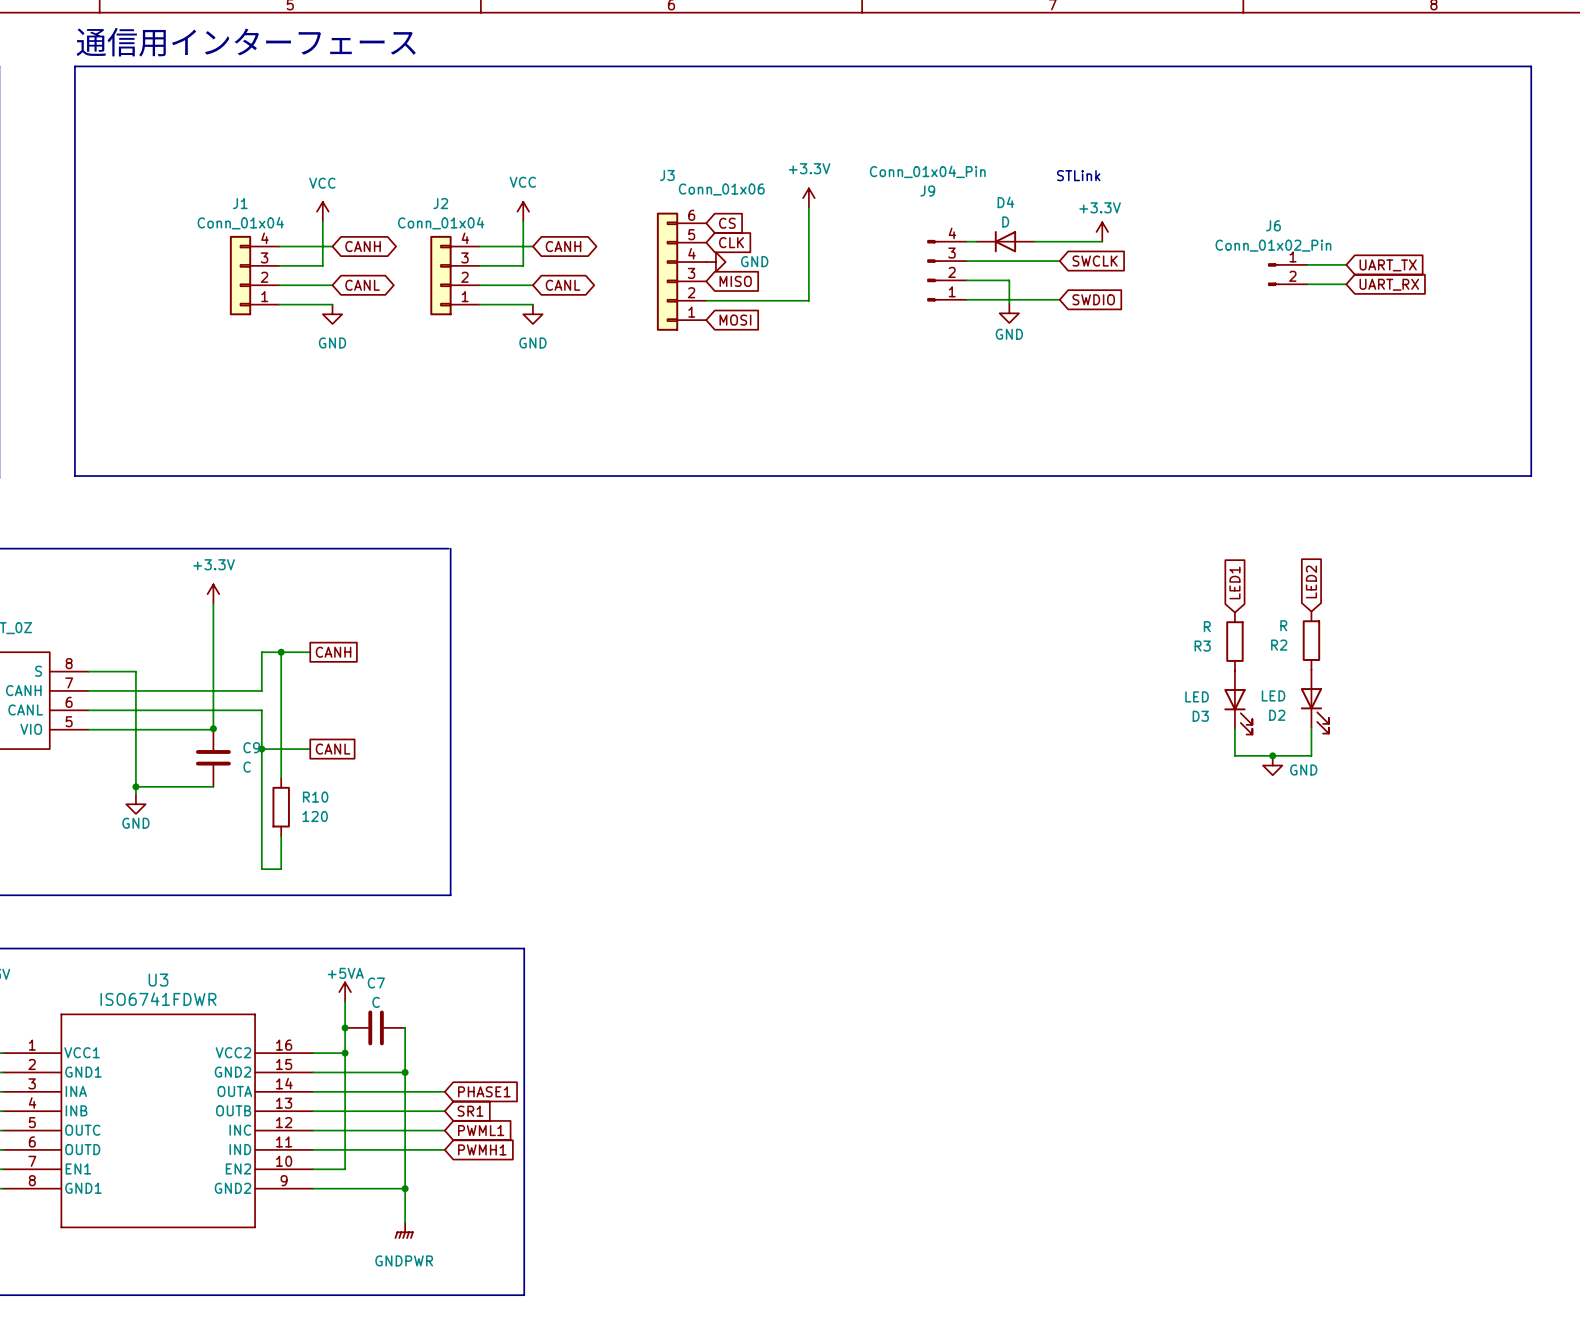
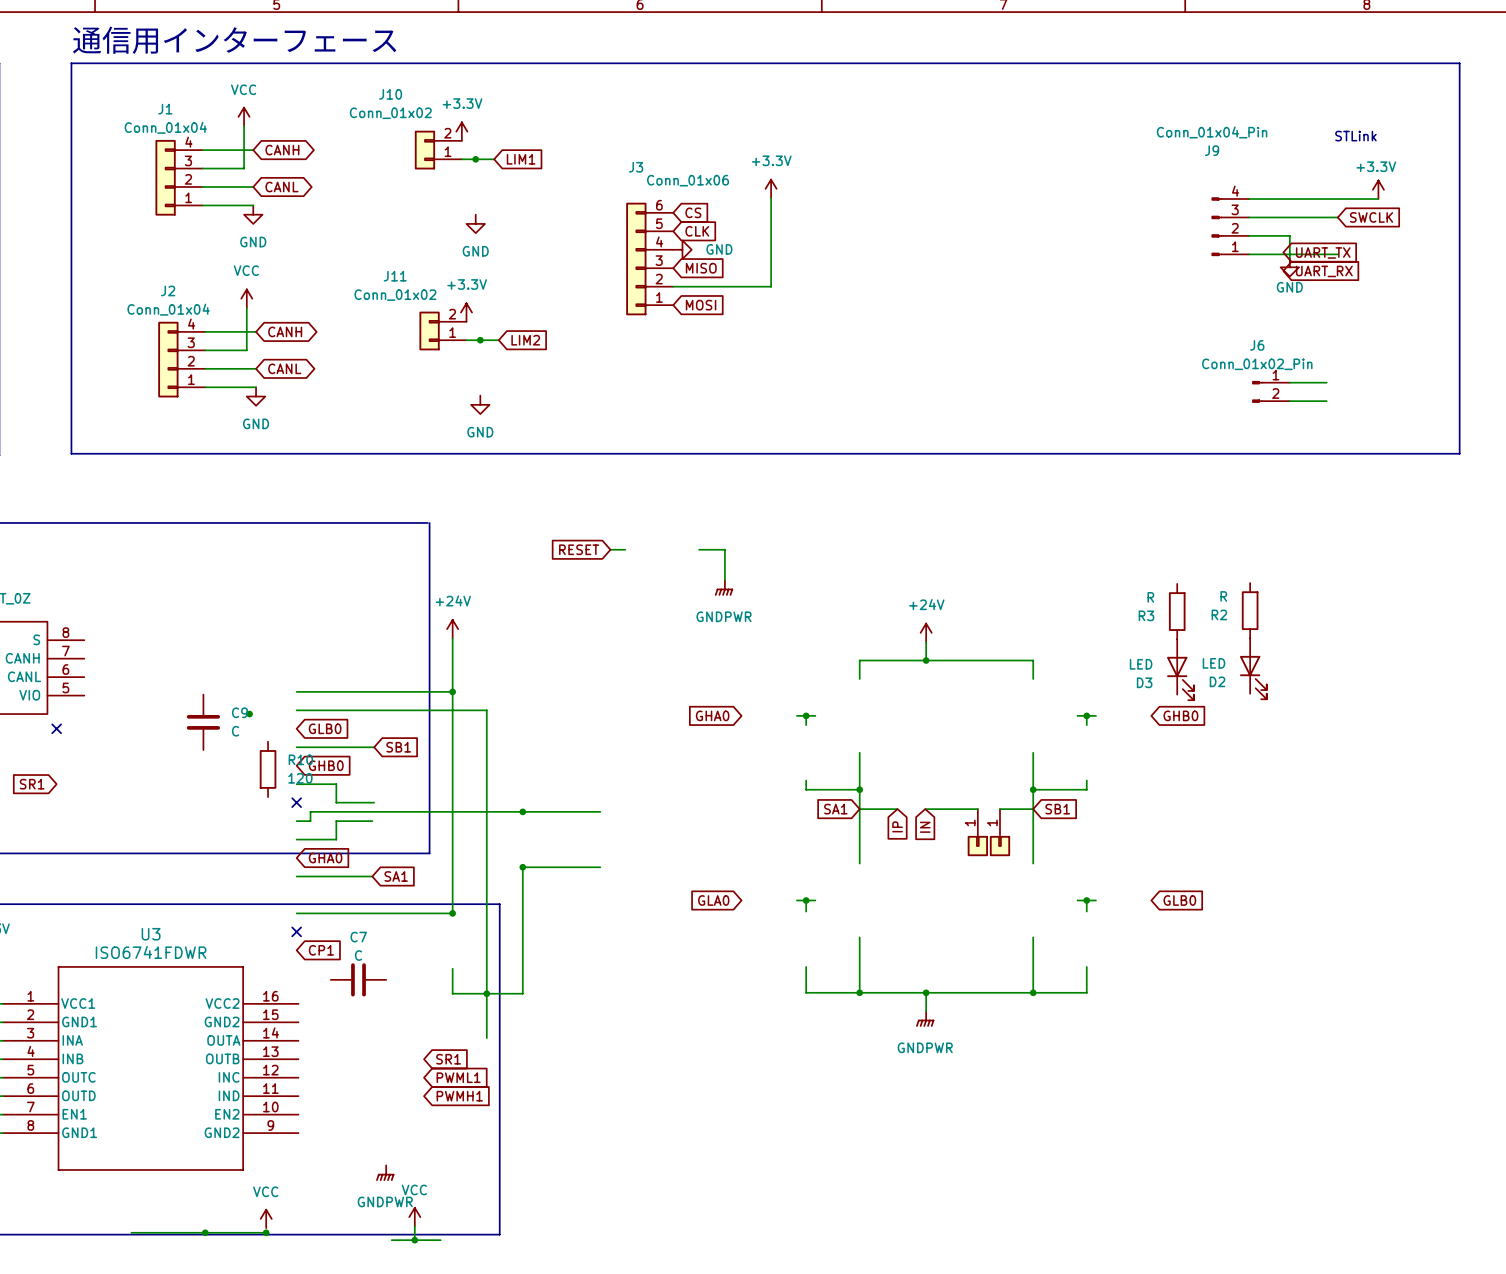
power symbol: none -> VCC (244, 116)
power symbol: none -> +3.3V (461, 131)
text: none -> STLink (1355, 136)
global label: none -> CANH (282, 150)
J10: none -> Conn_01x02 (438, 150)
wire: none -> (461, 159) (494, 159)
junction: none -> (475, 159)
global label: none -> LIM1 (521, 159)
text: STLink (1078, 175) -> none
global label: none -> CANL (281, 187)
power symbol: none -> +3.3V (1378, 189)
wire: none -> (1249, 199) (1378, 199)
power symbol: VCC (322, 211) -> none
power symbol: VCC (523, 211) -> none
wire: (322, 221) (322, 265) (279, 265) -> (244, 126) (244, 168) (202, 168)
wire: (523, 221) (523, 265) (479, 265) -> none
power symbol: none -> GND (253, 214)
wire: none -> (1249, 217) (1337, 217)
global label: none -> SWCLK (1371, 217)
power symbol: +3.3V (1102, 232) -> none
power symbol: none -> GND (475, 223)
wire: (966, 241) (976, 241) -> none
D4: D (1005, 241) -> none
wire: (1034, 241) (1102, 241) -> none
wire: (279, 246) (332, 246) -> (202, 150) (253, 150)
global label: CANH (363, 246) -> none
wire: (479, 246) (532, 246) -> none
global label: CANH (563, 246) -> none
wire: none -> (1249, 235) (1289, 235) (1289, 258)
wire: (966, 261) (1059, 261) -> none
global label: SWCLK (1095, 261) -> none
wire: (1307, 264) (1346, 264) -> (1289, 382) (1326, 382)
wire: none -> (1249, 254) (1337, 254)
J9 position: (947, 270) -> (1230, 226)
J6 position: (1287, 274) -> (1271, 391)
J1 position: (254, 275) -> (178, 177)
J2 position: (454, 275) -> (181, 359)
wire: (966, 280) (1009, 280) (1009, 303) -> none
power symbol: none -> GND (1289, 267)
wire: (1307, 284) (1346, 284) -> (1289, 401) (1326, 401)
wire: (279, 285) (332, 285) -> (202, 187) (253, 187)
global label: CANL (362, 285) -> none
wire: (479, 285) (532, 285) -> none
global label: CANL (563, 285) -> none
wire: (966, 299) (1059, 299) -> none
global label: SWDIO (1093, 299) -> none
wire: (279, 304) (332, 304) -> (202, 205) (253, 205)
wire: (479, 304) (532, 304) -> none
power symbol: none -> VCC (246, 298)
power symbol: GND (1009, 313) -> none
power symbol: GND (332, 314) -> none
power symbol: GND (532, 314) -> none
wire: none -> (246, 307) (246, 350) (205, 350)
power symbol: none -> +3.3V (466, 312)
J11: none -> Conn_01x02 (442, 330)
wire: none -> (205, 331) (256, 331)
global label: none -> CANH (285, 331)
wire: none -> (466, 340) (498, 340)
junction: none -> (480, 340)
global label: none -> LIM2 (525, 340)
wire: none -> (205, 368) (256, 368)
global label: none -> CANL (284, 368)
wire: none -> (205, 387) (256, 387)
power symbol: none -> GND (256, 396)
power symbol: none -> GND (480, 404)
global label: none -> RESET (579, 549)
wire: none -> (610, 549) (625, 549)
wire: none -> (699, 549) (724, 549) (724, 580)
global label: LED2 (1311, 581) -> none
global label: LED1 (1234, 582) -> none
power symbol: +3.3V (213, 594) -> none
wire: (213, 603) (213, 729) (88, 729) -> none
power symbol: none -> GNDPWR (724, 587)
wire: (281, 652) (281, 778) -> none
junction: (281, 652) -> none
wire: (310, 652) (261, 652) (261, 690) (88, 690) -> none
global label: CANH (333, 652) -> none
power symbol: none -> +24V (452, 629)
power symbol: none -> +24V (926, 632)
wire: none -> (452, 638) (452, 913) (296, 913)
wire: (88, 671) (135, 671) (135, 794) -> none
wire: none -> (926, 642) (926, 660)
junction: none -> (926, 660)
wire: (88, 710) (261, 710) (261, 869) (281, 869) (281, 836) -> none
wire: none -> (859, 678) (859, 660) (1033, 660) (1033, 678)
wire: none -> (296, 691) (452, 691)
junction: none -> (452, 691)
wire: (1311, 727) (1311, 755) (1234, 755) (1234, 728) -> none
junction: (213, 728) -> none
wire: none -> (296, 710) (486, 710) (486, 1038)
wire: (261, 749) (310, 749) -> none
global label: CANL (333, 749) -> none
global label: none -> GHA0 (712, 715)
wire: none -> (796, 715) (815, 715)
wire: none -> (806, 715) (806, 725)
junction: none -> (806, 715)
wire: none -> (1077, 715) (1095, 715)
wire: none -> (1086, 715) (1086, 725)
junction: none -> (1086, 715)
global label: none -> GHB0 (1180, 715)
junction: (1272, 755) -> none
no-connect mark: none -> (56, 728)
global label: none -> GLB0 (325, 728)
power symbol: GND (1272, 765) -> none
wire: none -> (296, 747) (374, 747)
global label: none -> SB1 (398, 747)
wire: (135, 786) (213, 786) -> none
junction: (135, 786) -> none
wire: none -> (859, 752) (859, 863)
wire: none -> (1033, 752) (1033, 863)
global label: none -> GHB0 (326, 765)
power symbol: GND (135, 804) -> none
wire: none -> (806, 780) (806, 789) (859, 789)
wire: none -> (1086, 780) (1086, 789) (1033, 789)
global label: none -> SR1 (32, 784)
wire: none -> (296, 784) (336, 784) (336, 802) (374, 802)
junction: none -> (859, 789)
junction: none -> (1033, 789)
no-connect mark: none -> (296, 802)
global label: none -> SA1 (835, 809)
wire: none -> (859, 809) (897, 809)
wire: none -> (925, 809) (977, 809)
wire: none -> (999, 809) (1033, 809)
global label: none -> SB1 (1057, 809)
junction: none -> (522, 811)
wire: none -> (600, 811) (310, 811) (310, 821) (296, 821)
wire: none -> (372, 821) (336, 821) (336, 839) (296, 839)
global label: none -> IP (897, 826)
global label: none -> IN (925, 827)
part: none -> (977, 832)
part: none -> (999, 832)
global label: none -> GHA0 (325, 858)
junction: none -> (522, 867)
wire: none -> (600, 867) (522, 867) (522, 993) (452, 993) (452, 968)
wire: none -> (296, 876) (372, 876)
global label: none -> SA1 (396, 876)
global label: none -> GLA0 (713, 900)
wire: none -> (796, 900) (815, 900)
wire: none -> (806, 900) (806, 911)
junction: none -> (806, 900)
wire: none -> (1077, 900) (1095, 900)
wire: none -> (1086, 900) (1086, 911)
junction: none -> (1086, 900)
global label: none -> GLB0 (1179, 900)
junction: none -> (452, 913)
no-connect mark: none -> (296, 931)
wire: none -> (859, 937) (859, 992)
wire: none -> (1033, 937) (1033, 992)
power symbol: +5VA (345, 992) -> none
global label: none -> CP1 (321, 950)
wire: (345, 1001) (345, 1169) (313, 1169) -> none
wire: none -> (806, 966) (806, 992) (1086, 992) (1086, 966)
junction: (345, 1027) -> none
wire: (405, 1027) (405, 1222) -> none
junction: none -> (859, 992)
wire: none -> (926, 992) (926, 1011)
junction: none -> (926, 992)
junction: none -> (1033, 992)
junction: none -> (486, 993)
wire: (313, 1053) (345, 1053) -> none
junction: (345, 1053) -> none
power symbol: none -> GNDPWR (925, 1019)
wire: (313, 1072) (405, 1072) -> none
junction: (405, 1072) -> none
wire: (313, 1091) (444, 1091) -> none
global label: PHASE1 (484, 1091) -> none
wire: (313, 1111) (444, 1111) -> none
wire: (313, 1130) (444, 1130) -> none
wire: (313, 1149) (444, 1149) -> none
wire: (313, 1188) (405, 1188) -> none
junction: (405, 1188) -> none
power symbol: none -> VCC (414, 1217)
power symbol: none -> VCC (266, 1218)
wire: none -> (414, 1226) (414, 1240)
wire: none -> (131, 1232) (266, 1232)
junction: none -> (205, 1232)
junction: none -> (266, 1232)
wire: none -> (391, 1240) (440, 1240)
junction: none -> (414, 1240)

